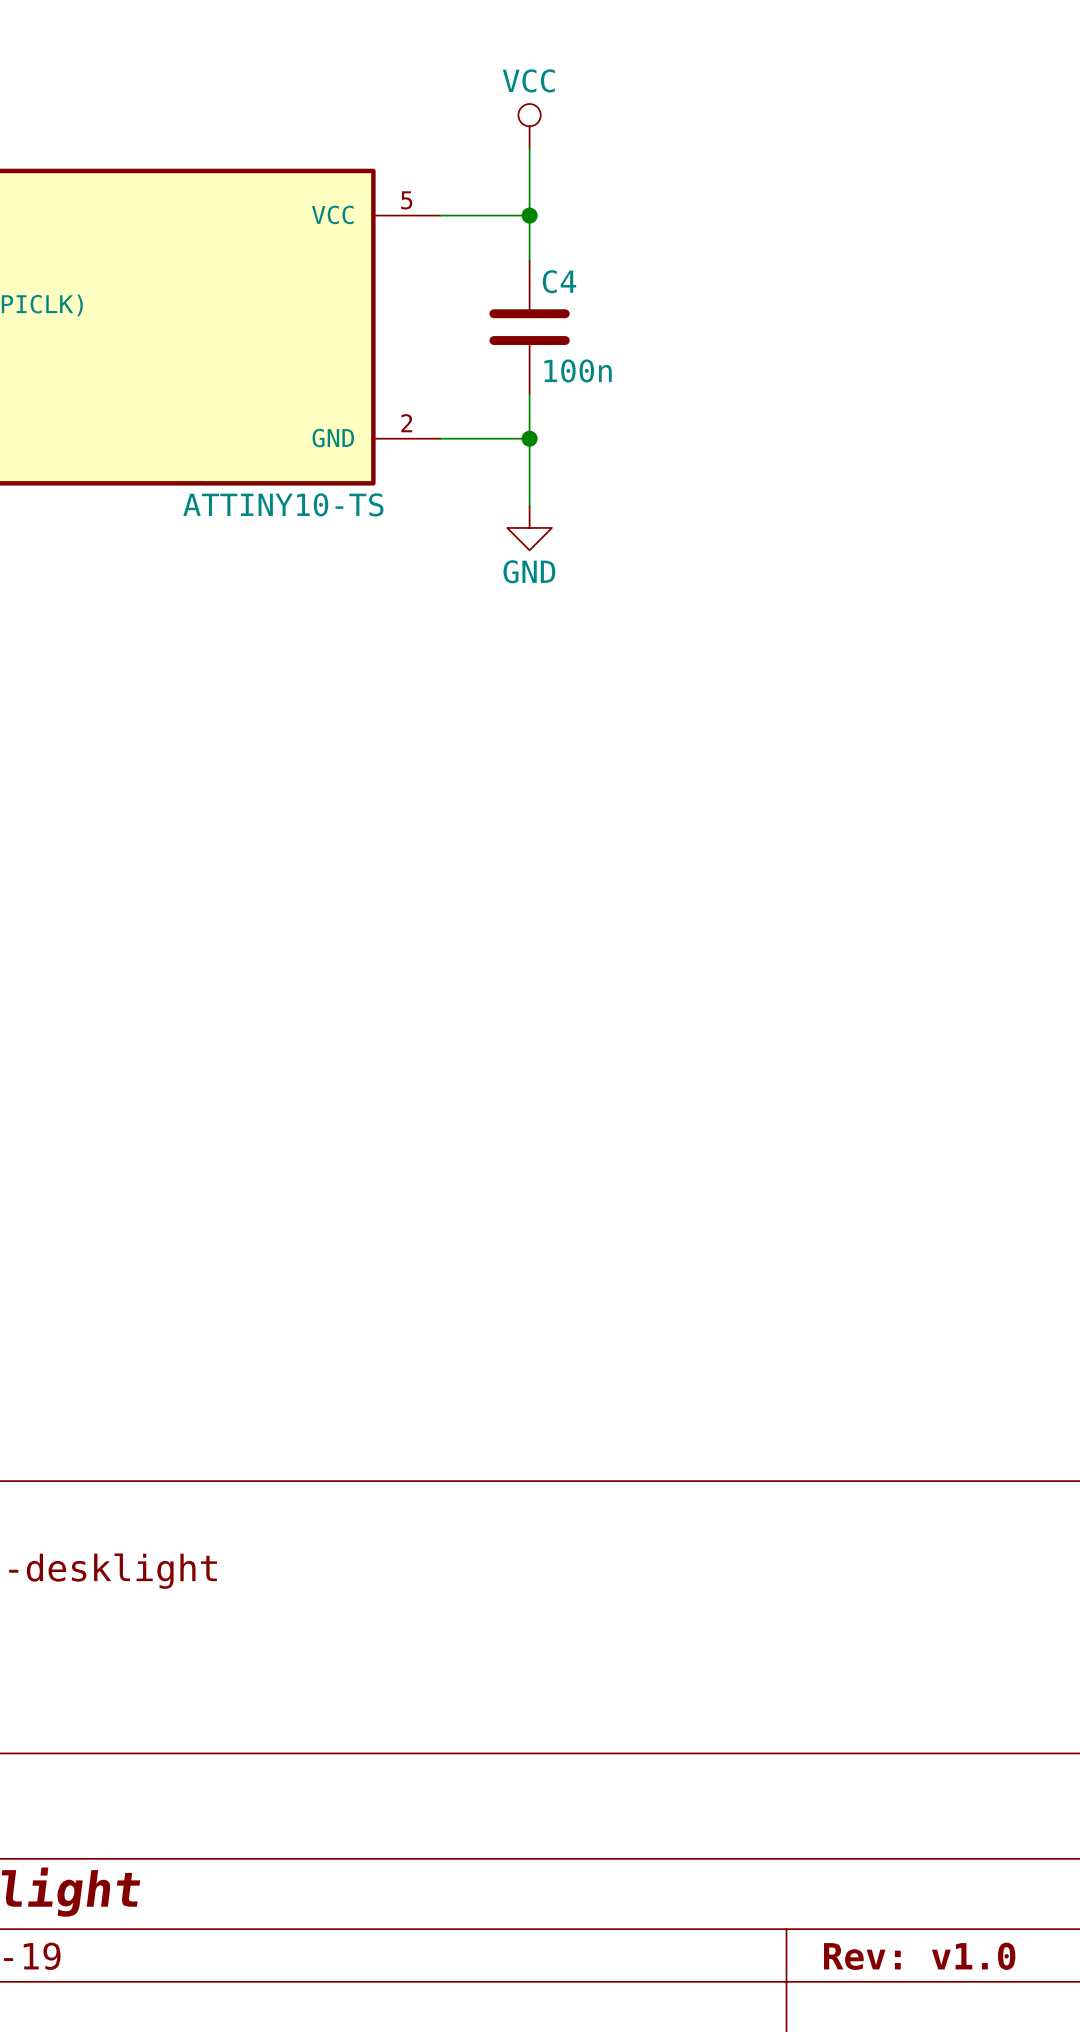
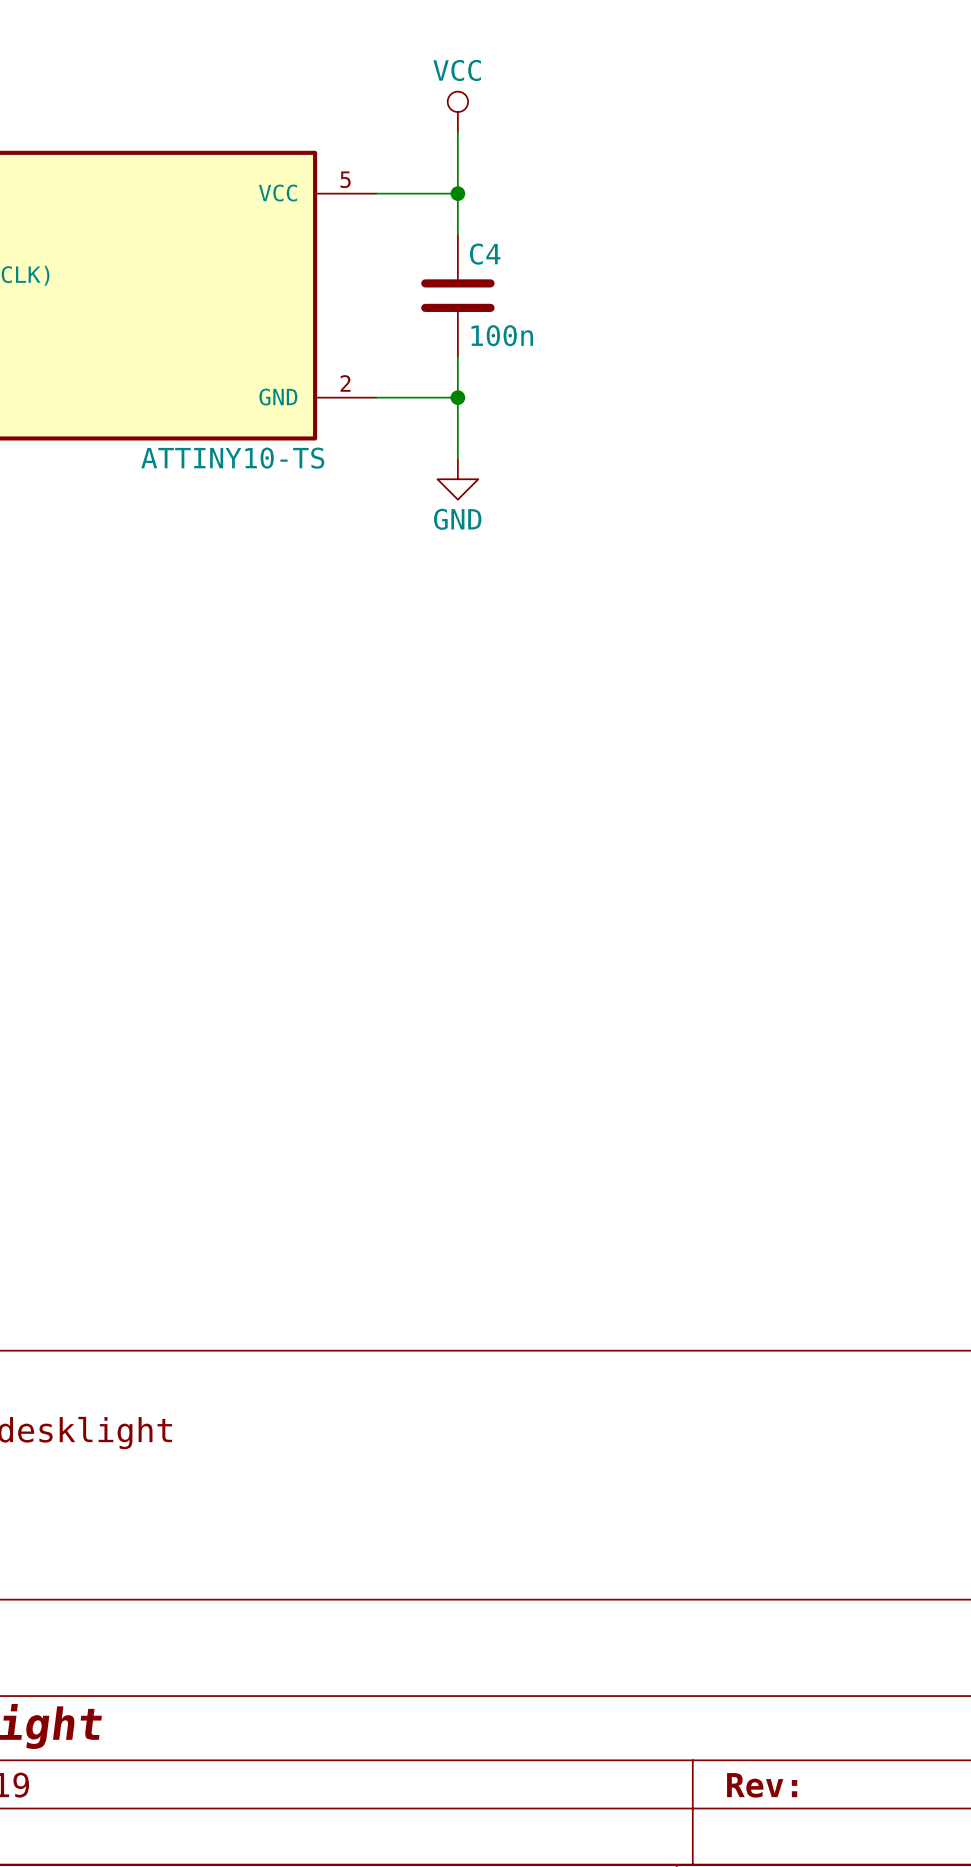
title block: Rev: v1.0 (919, 1956) -> Rev: (762, 1785)

